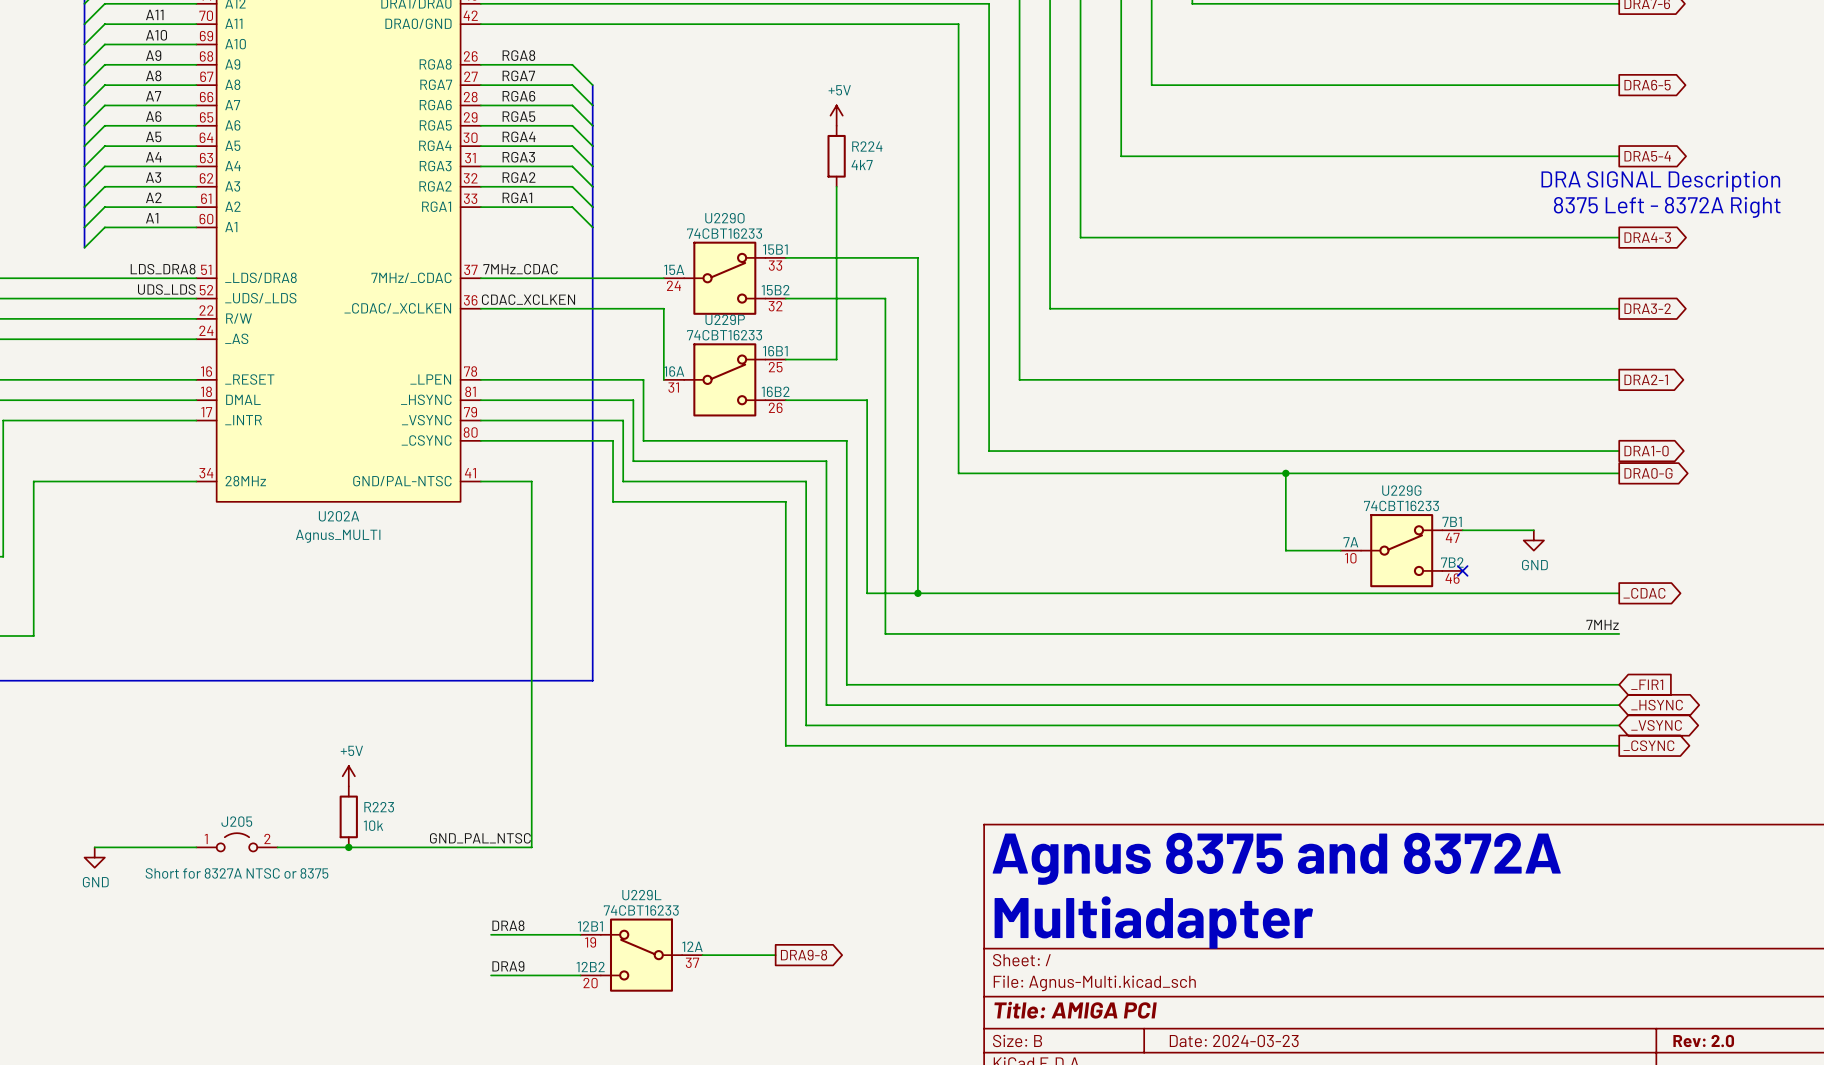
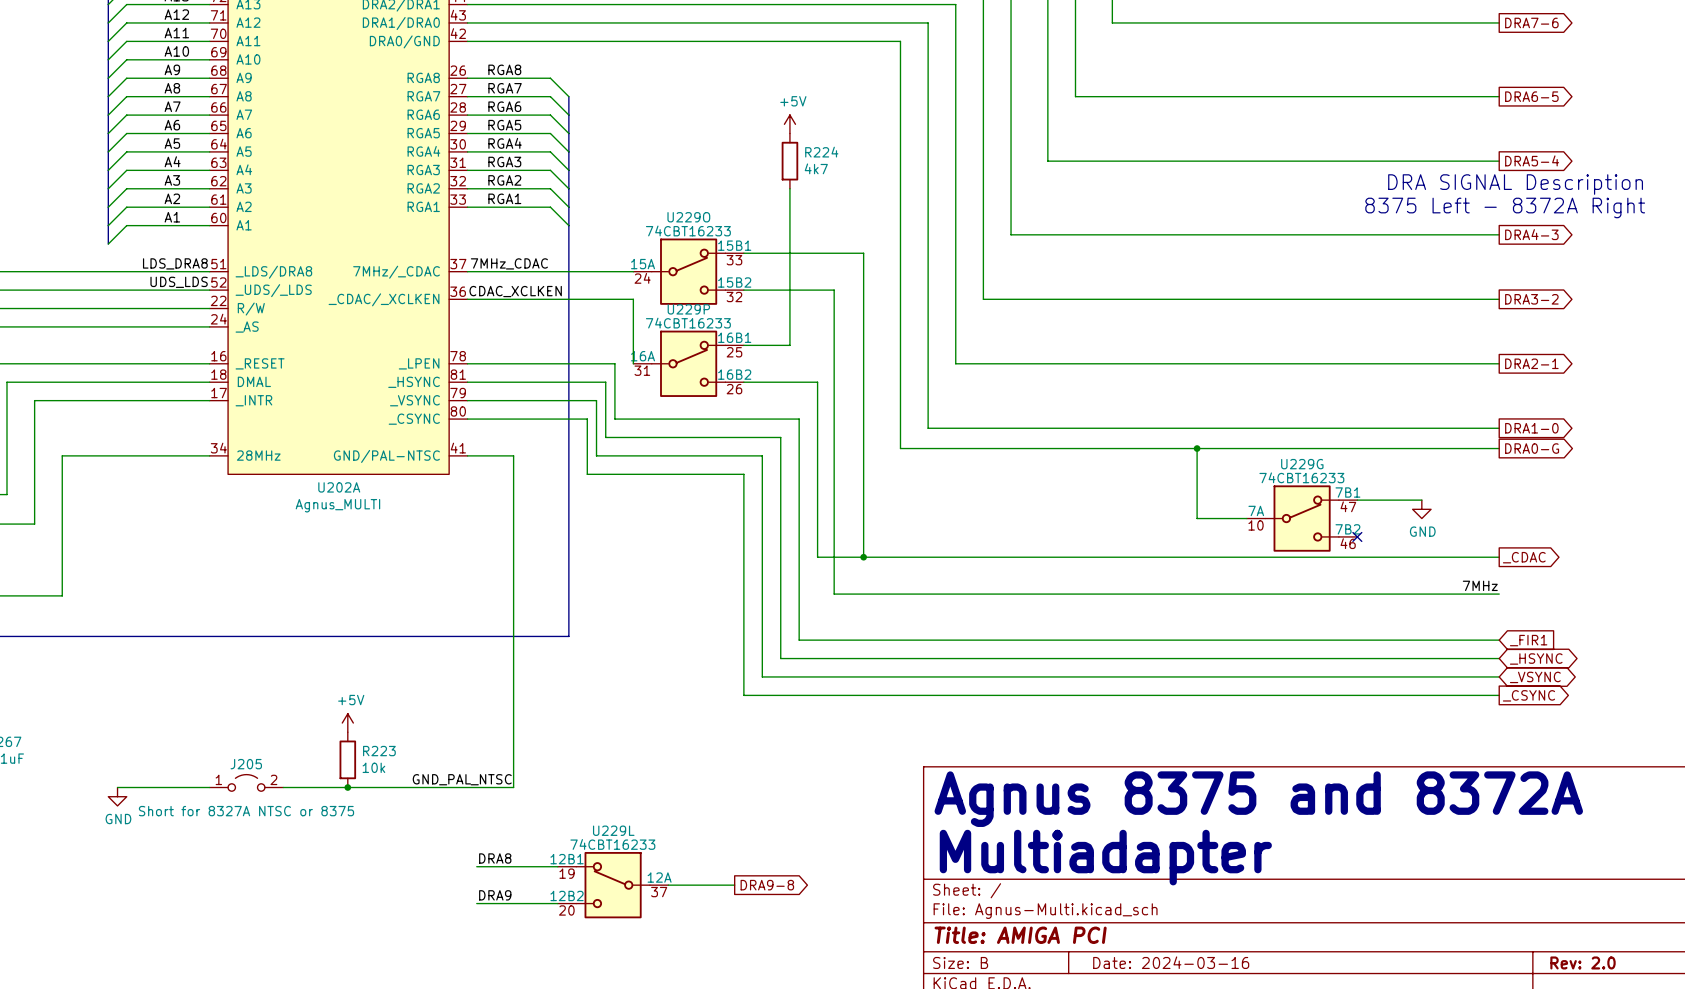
title block: Date: 2024-03-23 (1234, 1041) -> Date: 2024-03-16 (1171, 962)

